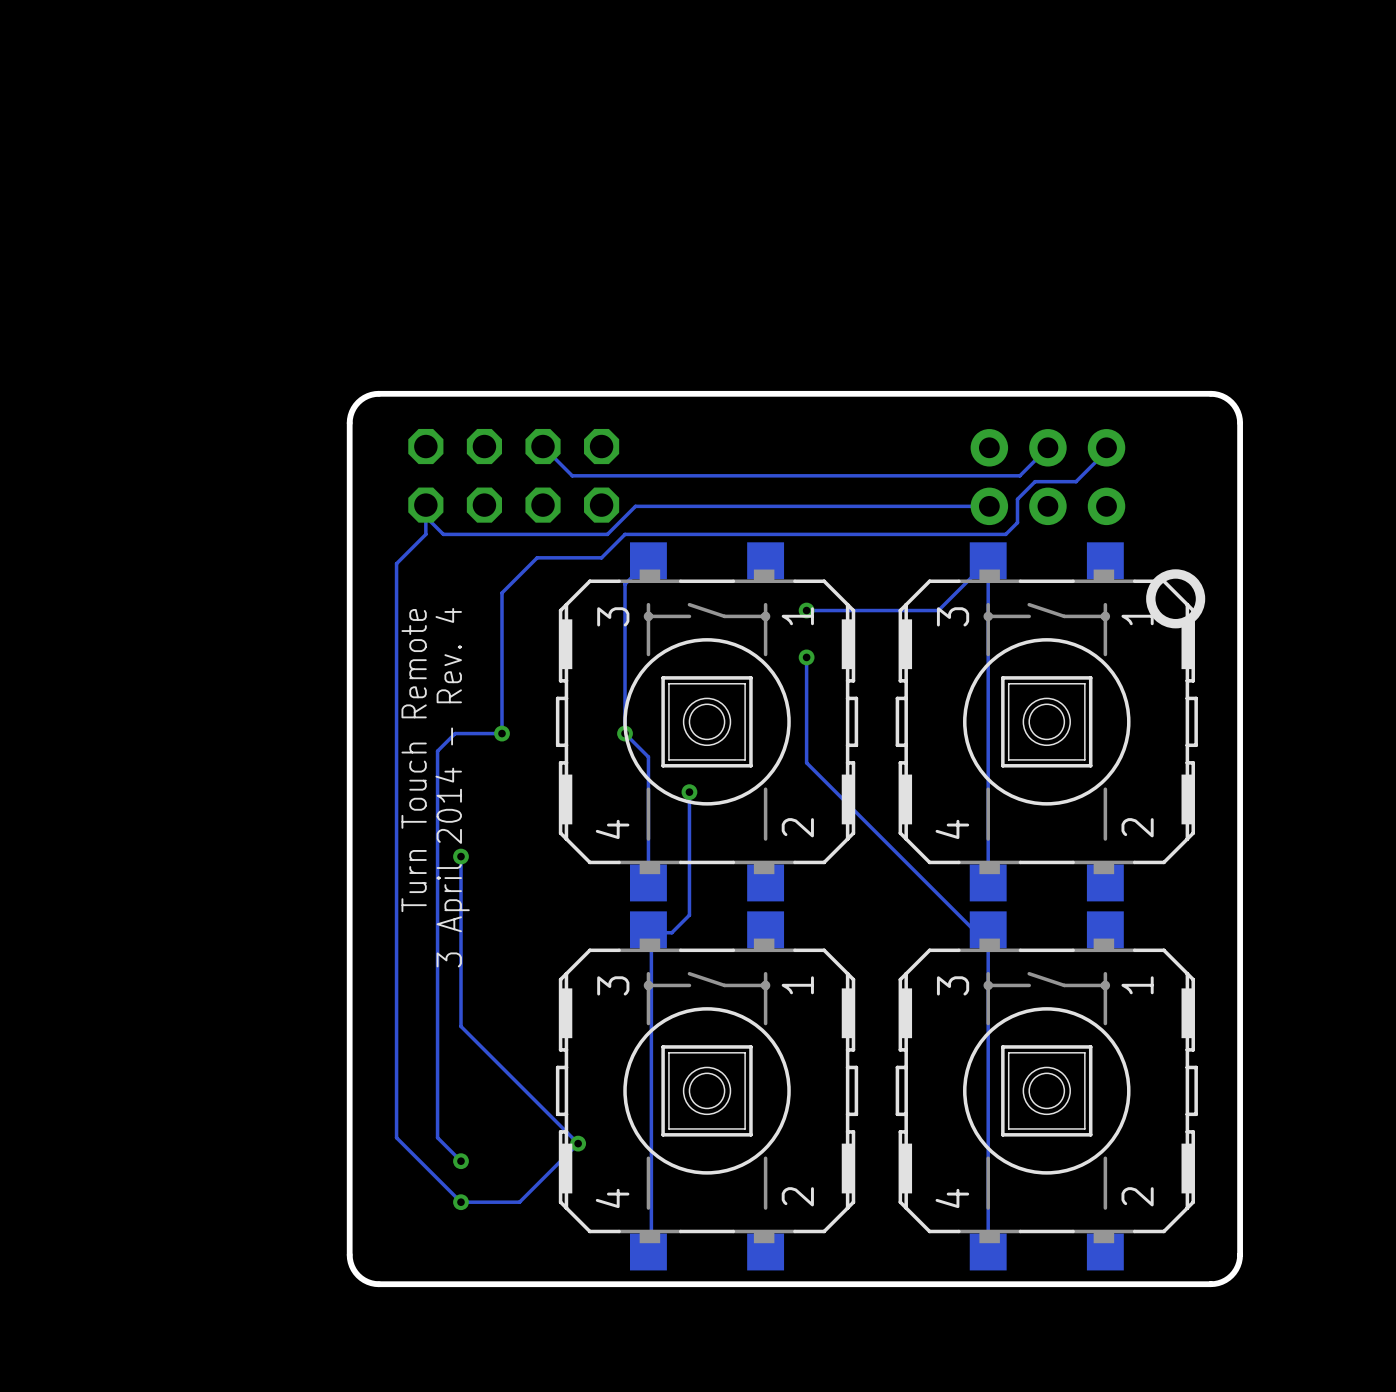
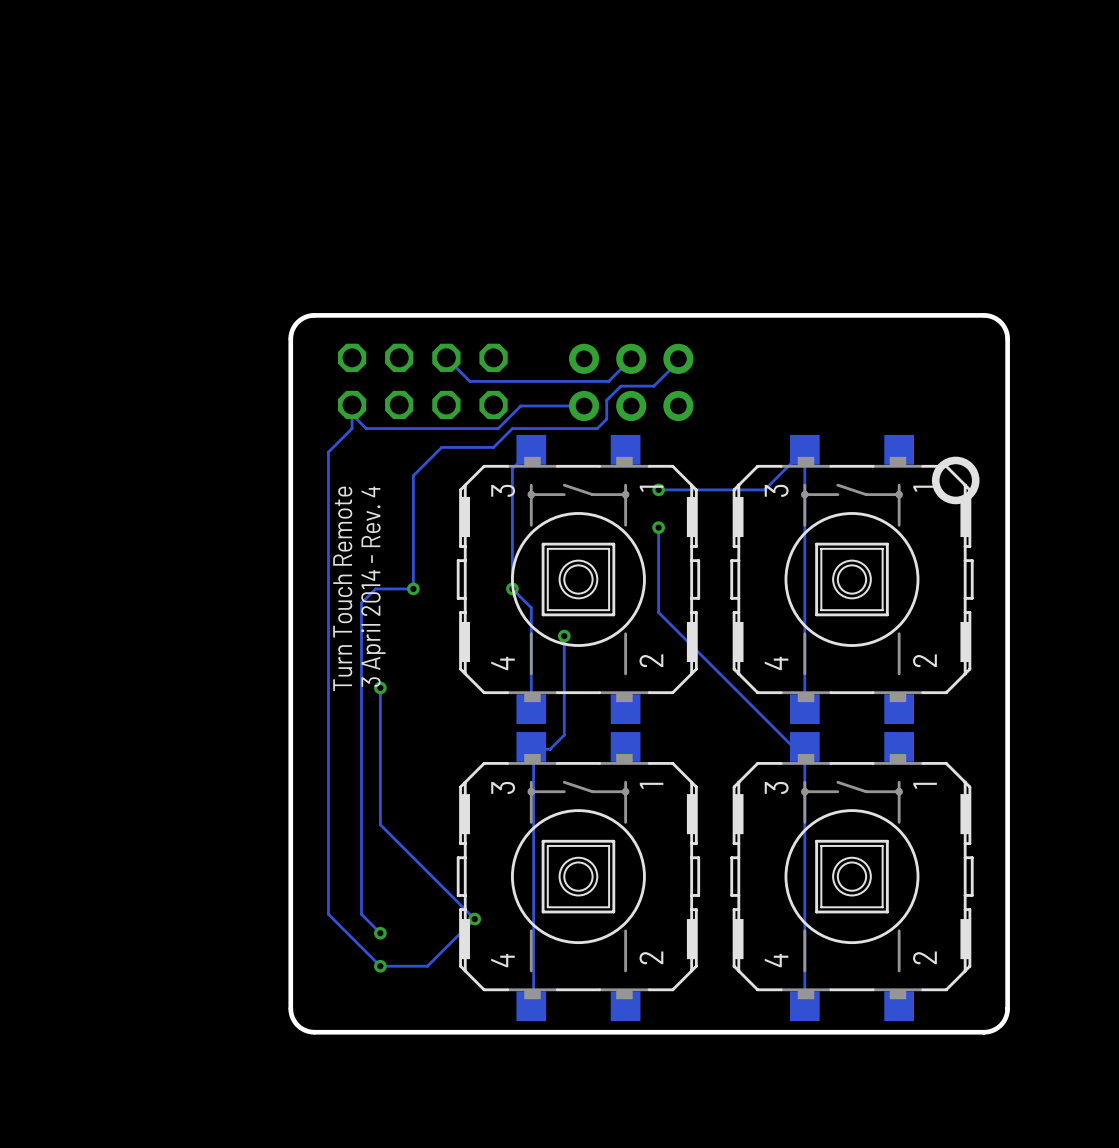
track: (1047, 447) (1019, 475) (744, 475) -> (631, 358) (608, 381)
track: (1106, 447) (1106, 451) (1076, 481) (1035, 481) (1017, 499) (1017, 522) (1005, 534) (730, 534) -> (678, 358) (678, 361) (653, 386) (620, 386) (606, 400) (606, 419) (597, 428)
part position: (1047, 477) -> (631, 382)
track: (989, 506) (714, 506) -> none

